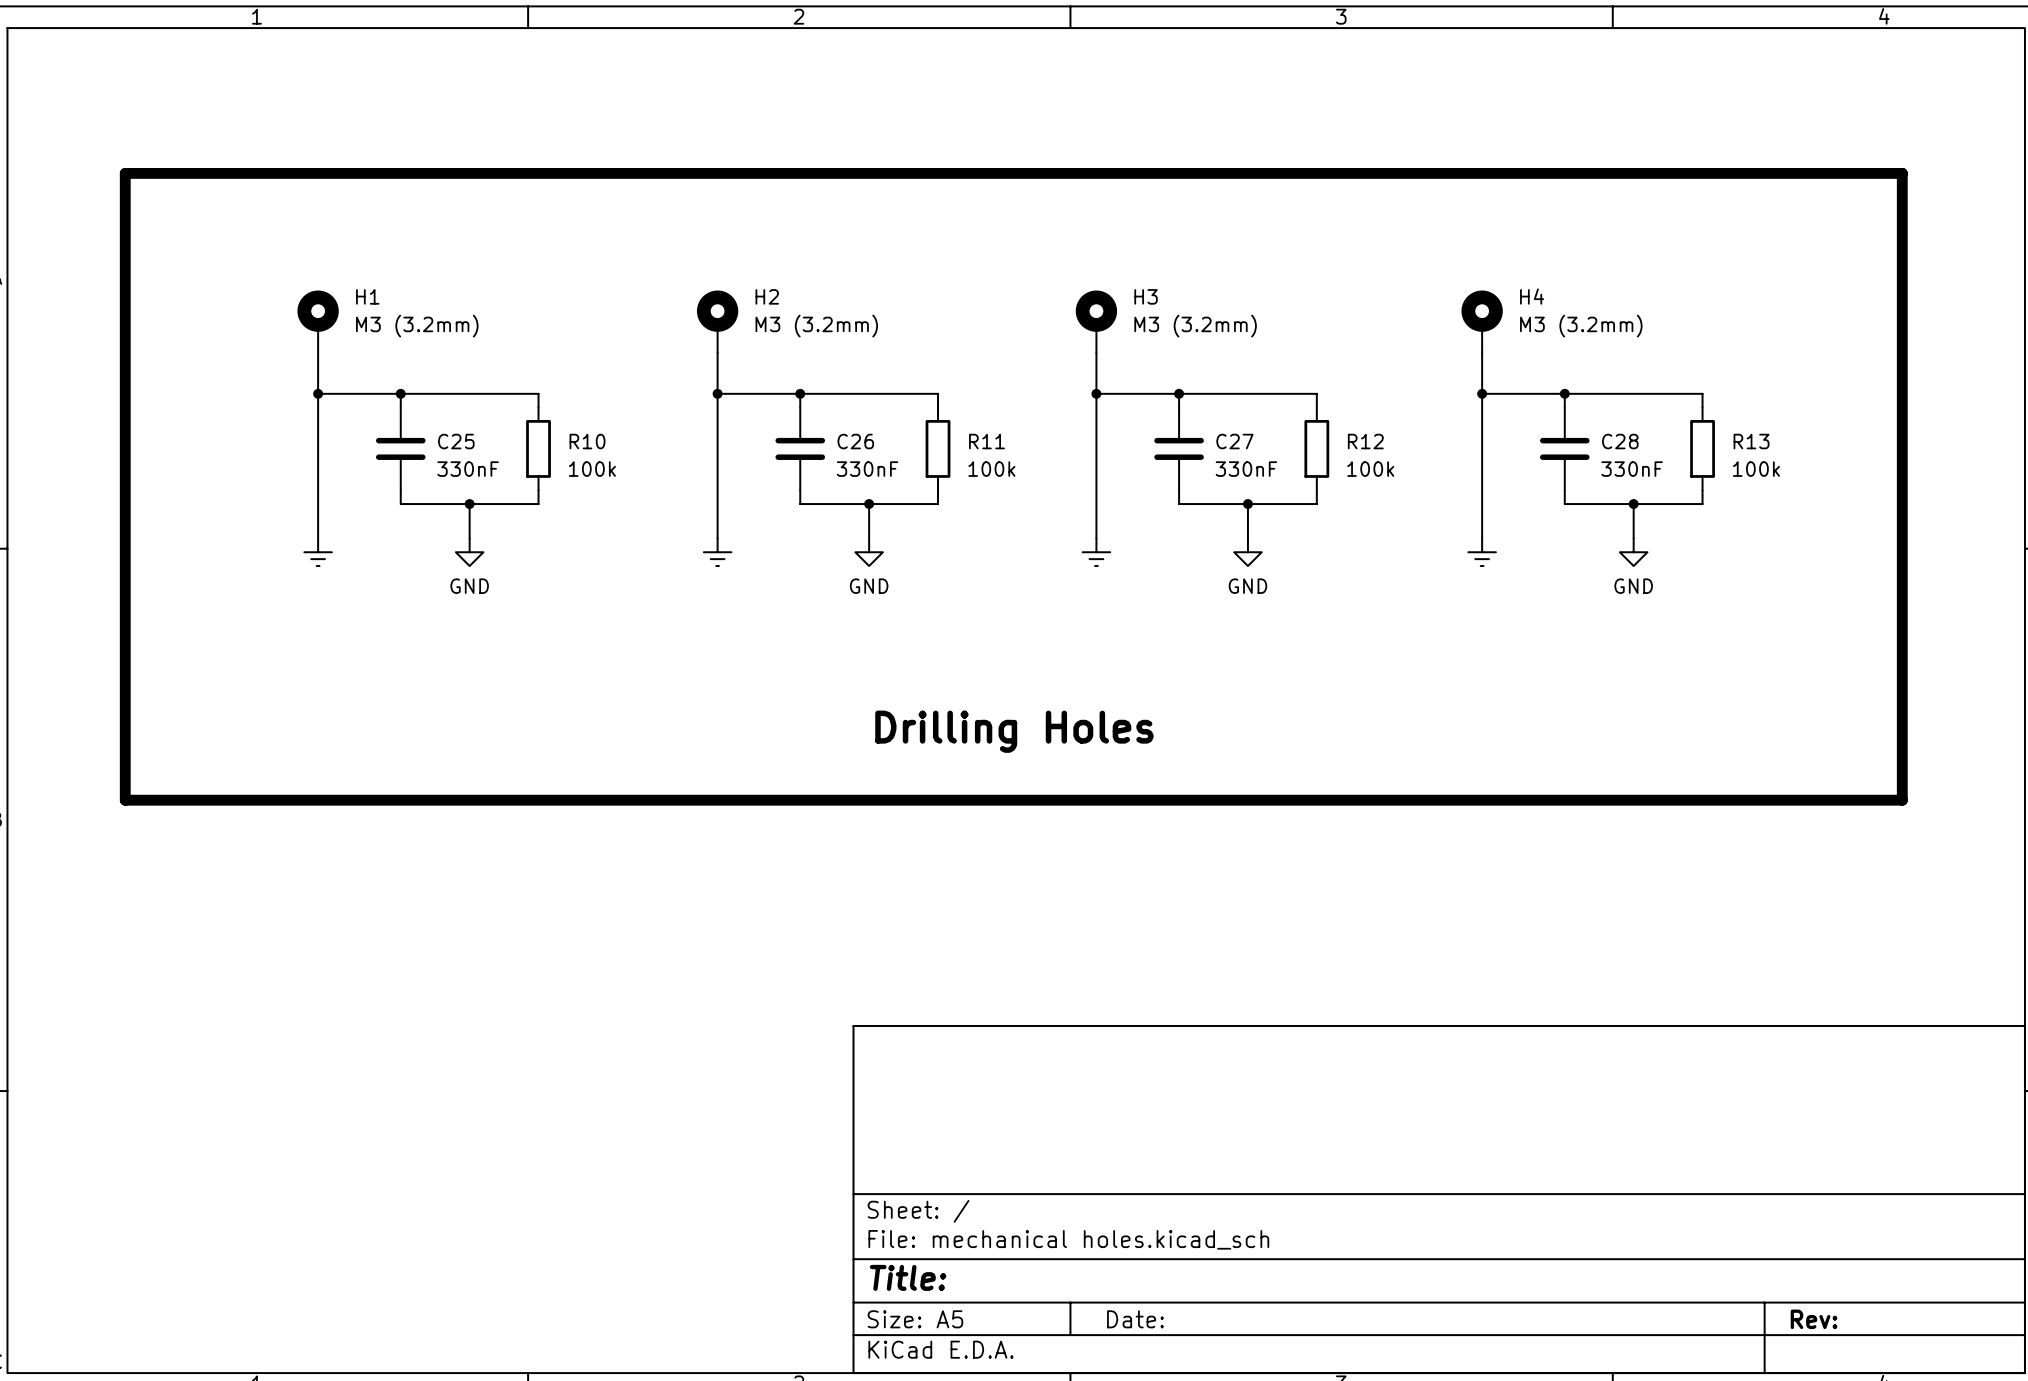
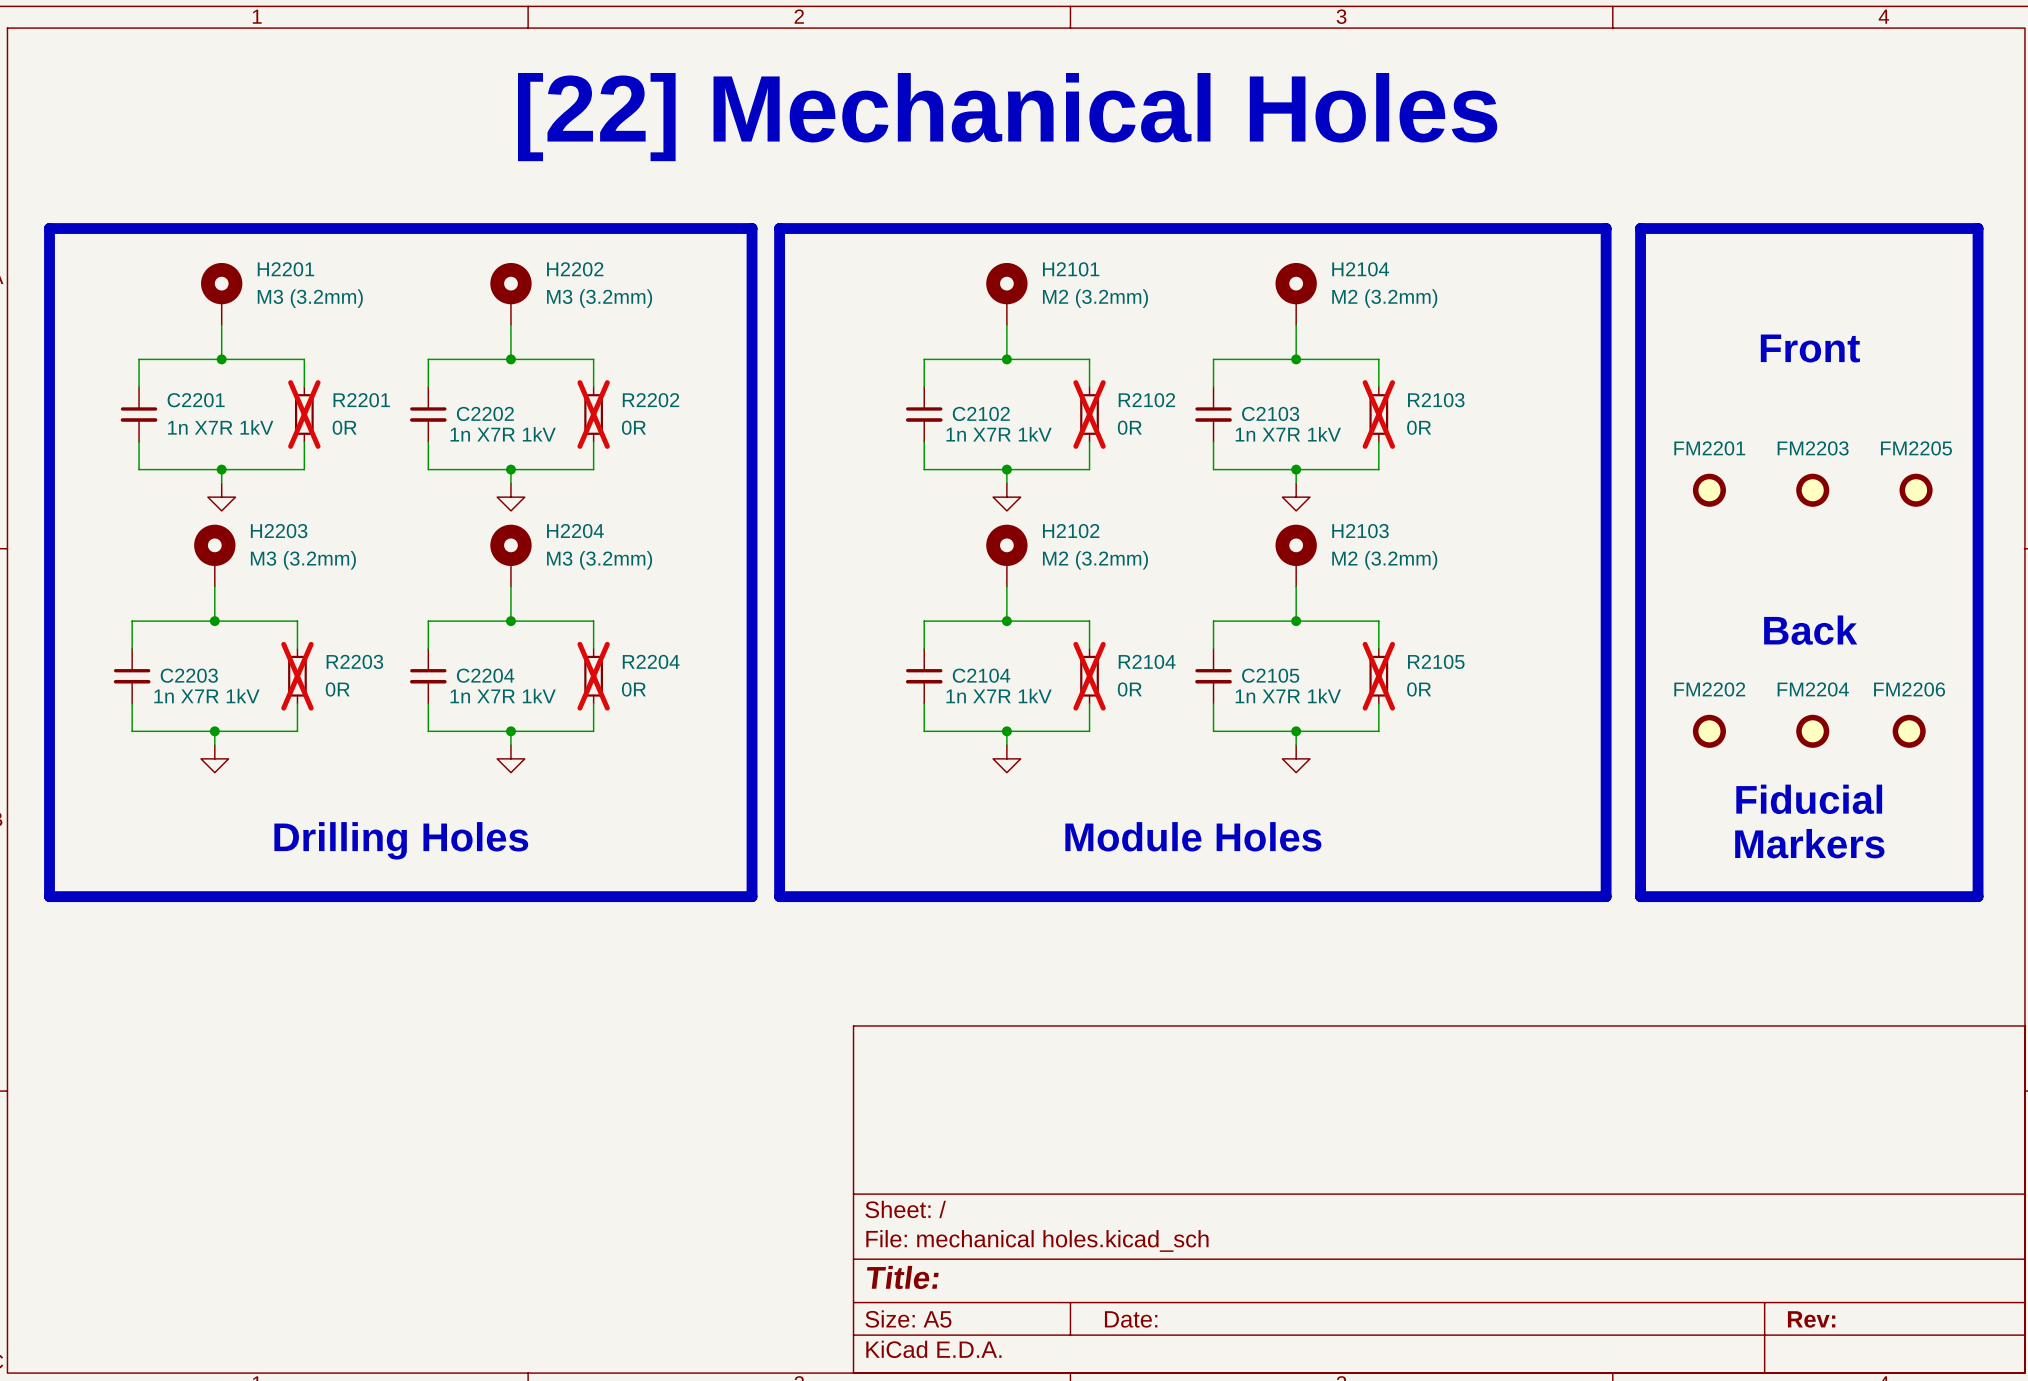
text: none -> [22] Mechanical Holes (1007, 117)
line: (125, 173) (1902, 173) (1902, 800) (125, 800) (125, 173) -> none
line: none -> (49, 228) (752, 228) (752, 896) (49, 896) (49, 228)
line: none -> (779, 228) (1606, 228) (1606, 896) (779, 896) (779, 228)
line: none -> (1640, 228) (1978, 228) (1978, 896) (1640, 896) (1640, 228)
H2201: none -> M3 (3.2mm) (221, 293)
H2202: none -> M3 (3.2mm) (510, 293)
H2101: none -> M2 (3.2mm) (1006, 293)
H2104: none -> M2 (3.2mm) (1296, 293)
H1: M3 (3.2mm) (318, 321) -> none
H2: M3 (3.2mm) (717, 321) -> none
H3: M3 (3.2mm) (1096, 321) -> none
H4: M3 (3.2mm) (1482, 321) -> none
wire: none -> (221, 324) (221, 359)
wire: none -> (510, 324) (510, 359)
wire: none -> (1006, 324) (1006, 359)
wire: none -> (1296, 324) (1296, 359)
text: none -> Front (1810, 348)
wire: (318, 352) (318, 538) -> none
wire: (717, 352) (717, 538) -> none
wire: (1096, 352) (1096, 538) -> none
wire: (1482, 352) (1482, 538) -> none
junction: none -> (221, 359)
junction: none -> (510, 359)
junction: none -> (1006, 359)
junction: none -> (1296, 359)
wire: none -> (139, 386) (139, 359) (304, 359) (304, 386)
wire: none -> (428, 386) (428, 359) (593, 359) (593, 386)
wire: none -> (924, 386) (924, 359) (1089, 359) (1089, 386)
wire: none -> (1213, 386) (1213, 359) (1378, 359) (1378, 386)
wire: (318, 393) (538, 393) (538, 407) -> none
junction: (318, 393) -> none
wire: (400, 393) (400, 407) -> (510, 469) (510, 483)
junction: (400, 393) -> none
wire: (717, 393) (938, 393) (938, 407) -> none
junction: (717, 393) -> none
wire: (800, 393) (800, 407) -> (1006, 469) (1006, 483)
junction: (800, 393) -> none
wire: (1096, 393) (1316, 393) (1316, 407) -> none
junction: (1096, 393) -> none
wire: (1179, 393) (1179, 407) -> (1296, 469) (1296, 483)
junction: (1179, 393) -> none
wire: (1482, 393) (1702, 393) (1702, 407) -> none
junction: (1482, 393) -> none
wire: (1564, 393) (1564, 407) -> none
junction: (1564, 393) -> none
C2201: none -> 1n X7R 1kV (139, 414)
R2201: none -> 0R (304, 414)
C2202: none -> 1n X7R 1kV (428, 414)
R2202: none -> 0R (593, 414)
C2102: none -> 1n X7R 1kV (924, 414)
R2102: none -> 0R (1089, 414)
C2103: none -> 1n X7R 1kV (1213, 414)
R2103: none -> 0R (1378, 414)
wire: none -> (139, 442) (139, 469) (304, 469) (304, 442)
wire: none -> (428, 442) (428, 469) (593, 469) (593, 442)
wire: none -> (924, 442) (924, 469) (1089, 469) (1089, 442)
wire: none -> (1213, 442) (1213, 469) (1378, 469) (1378, 442)
C25: 330nF (400, 448) -> none
R10: 100k (538, 448) -> none
C26: 330nF (800, 448) -> none
R11: 100k (938, 448) -> none
C27: 330nF (1179, 448) -> none
R12: 100k (1316, 448) -> none
C28: 330nF (1564, 448) -> none
R13: 100k (1702, 448) -> none
wire: none -> (221, 469) (221, 483)
junction: none -> (221, 469)
junction: none -> (1006, 469)
wire: (400, 490) (400, 504) (538, 504) (538, 490) -> none
wire: (800, 490) (800, 504) (938, 504) (938, 490) -> none
wire: (1179, 490) (1179, 504) (1316, 504) (1316, 490) -> none
wire: (1564, 490) (1564, 504) (1702, 504) (1702, 490) -> none
FM2201: none -> (1709, 490)
FM2203: none -> (1812, 490)
FM2205: none -> (1916, 490)
power symbol: none -> (221, 497)
power symbol: none -> (510, 497)
power symbol: none -> (1006, 497)
power symbol: none -> (1296, 497)
wire: (469, 504) (469, 538) -> (510, 586) (510, 621)
junction position: (469, 504) -> (510, 469)
wire: (869, 504) (869, 538) -> (1006, 586) (1006, 621)
junction: (869, 504) -> none
wire: (1247, 504) (1247, 538) -> (1296, 586) (1296, 621)
junction position: (1247, 504) -> (1296, 469)
wire: (1633, 504) (1633, 538) -> none
junction: (1633, 504) -> none
power symbol: (318, 552) -> none
power symbol: GND (469, 552) -> none
power symbol: (717, 552) -> none
power symbol: GND (869, 552) -> none
power symbol: (1096, 552) -> none
power symbol: GND (1247, 552) -> none
power symbol: (1482, 552) -> none
power symbol: GND (1633, 552) -> none
H2203: none -> M3 (3.2mm) (214, 555)
H2204: none -> M3 (3.2mm) (510, 555)
H2102: none -> M2 (3.2mm) (1006, 555)
H2103: none -> M2 (3.2mm) (1296, 555)
wire: none -> (214, 586) (214, 621)
junction: none -> (214, 621)
junction: none -> (510, 621)
junction: none -> (1006, 621)
junction: none -> (1296, 621)
text: none -> Back (1810, 630)
wire: none -> (132, 648) (132, 621) (297, 621) (297, 648)
wire: none -> (428, 648) (428, 621) (593, 621) (593, 648)
wire: none -> (924, 648) (924, 621) (1089, 621) (1089, 648)
wire: none -> (1213, 648) (1213, 621) (1378, 621) (1378, 648)
C2203: none -> 1n X7R 1kV (132, 676)
R2203: none -> 0R (297, 676)
C2204: none -> 1n X7R 1kV (428, 676)
R2204: none -> 0R (593, 676)
C2104: none -> 1n X7R 1kV (924, 676)
R2104: none -> 0R (1089, 676)
C2105: none -> 1n X7R 1kV (1213, 676)
R2105: none -> 0R (1378, 676)
wire: none -> (132, 703) (132, 731) (297, 731) (297, 703)
wire: none -> (428, 703) (428, 731) (593, 731) (593, 703)
wire: none -> (924, 703) (924, 731) (1089, 731) (1089, 703)
wire: none -> (1213, 703) (1213, 731) (1378, 731) (1378, 703)
wire: none -> (214, 731) (214, 745)
junction: none -> (214, 731)
wire: none -> (510, 731) (510, 745)
junction: none -> (510, 731)
wire: none -> (1006, 731) (1006, 745)
junction: none -> (1006, 731)
text: Drilling Holes (1014, 731) -> none
wire: none -> (1296, 731) (1296, 745)
junction: none -> (1296, 731)
FM2202: none -> (1709, 731)
FM2204: none -> (1812, 731)
FM2206: none -> (1909, 731)
power symbol: none -> (214, 758)
power symbol: none -> (510, 758)
power symbol: none -> (1006, 758)
power symbol: none -> (1296, 758)
text: none -> Fiducial (1809, 799)
text: none -> Module Holes (1193, 836)
text: none -> Drilling Holes (401, 840)
text: none -> Markers (1809, 843)

